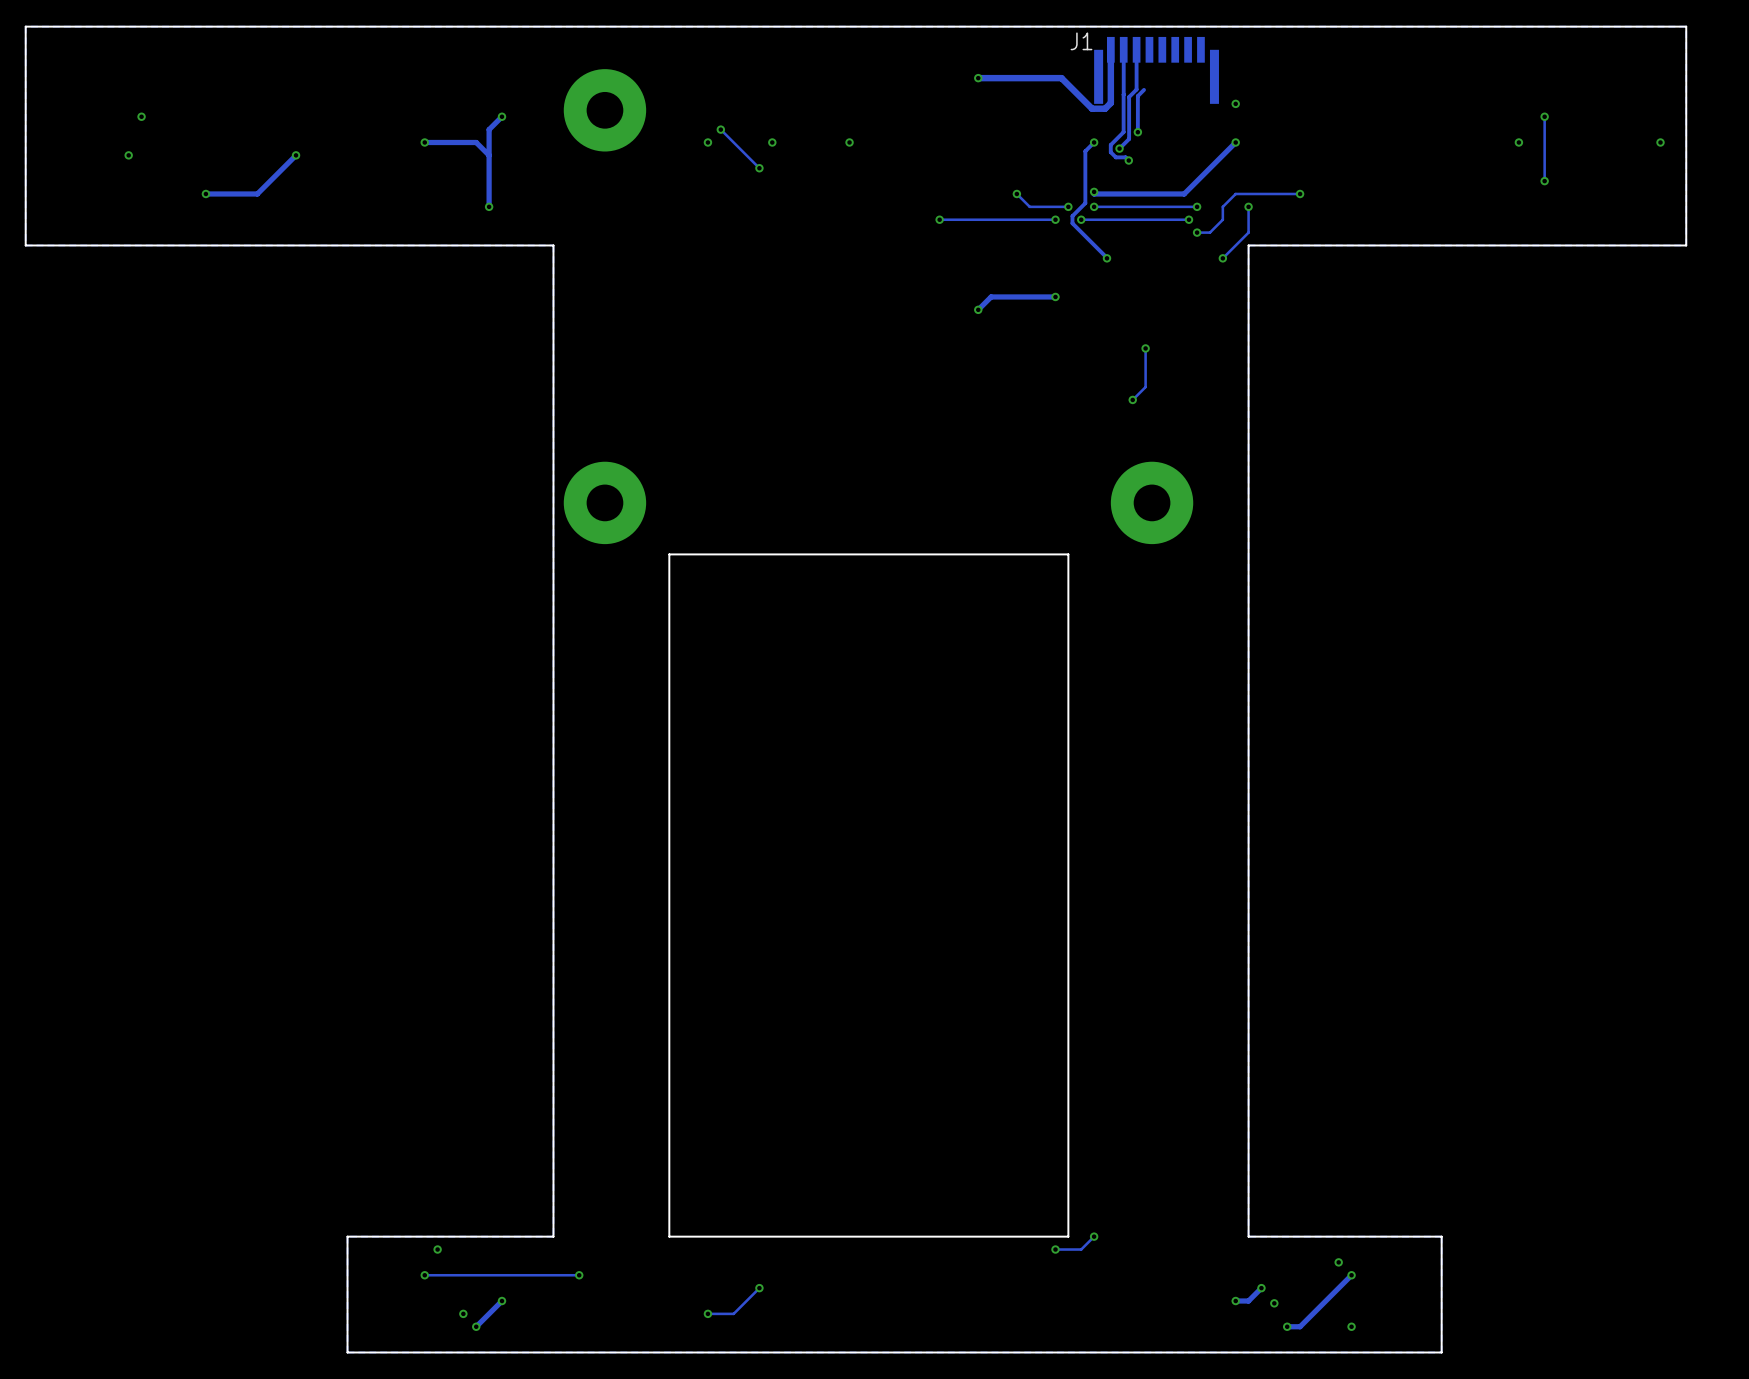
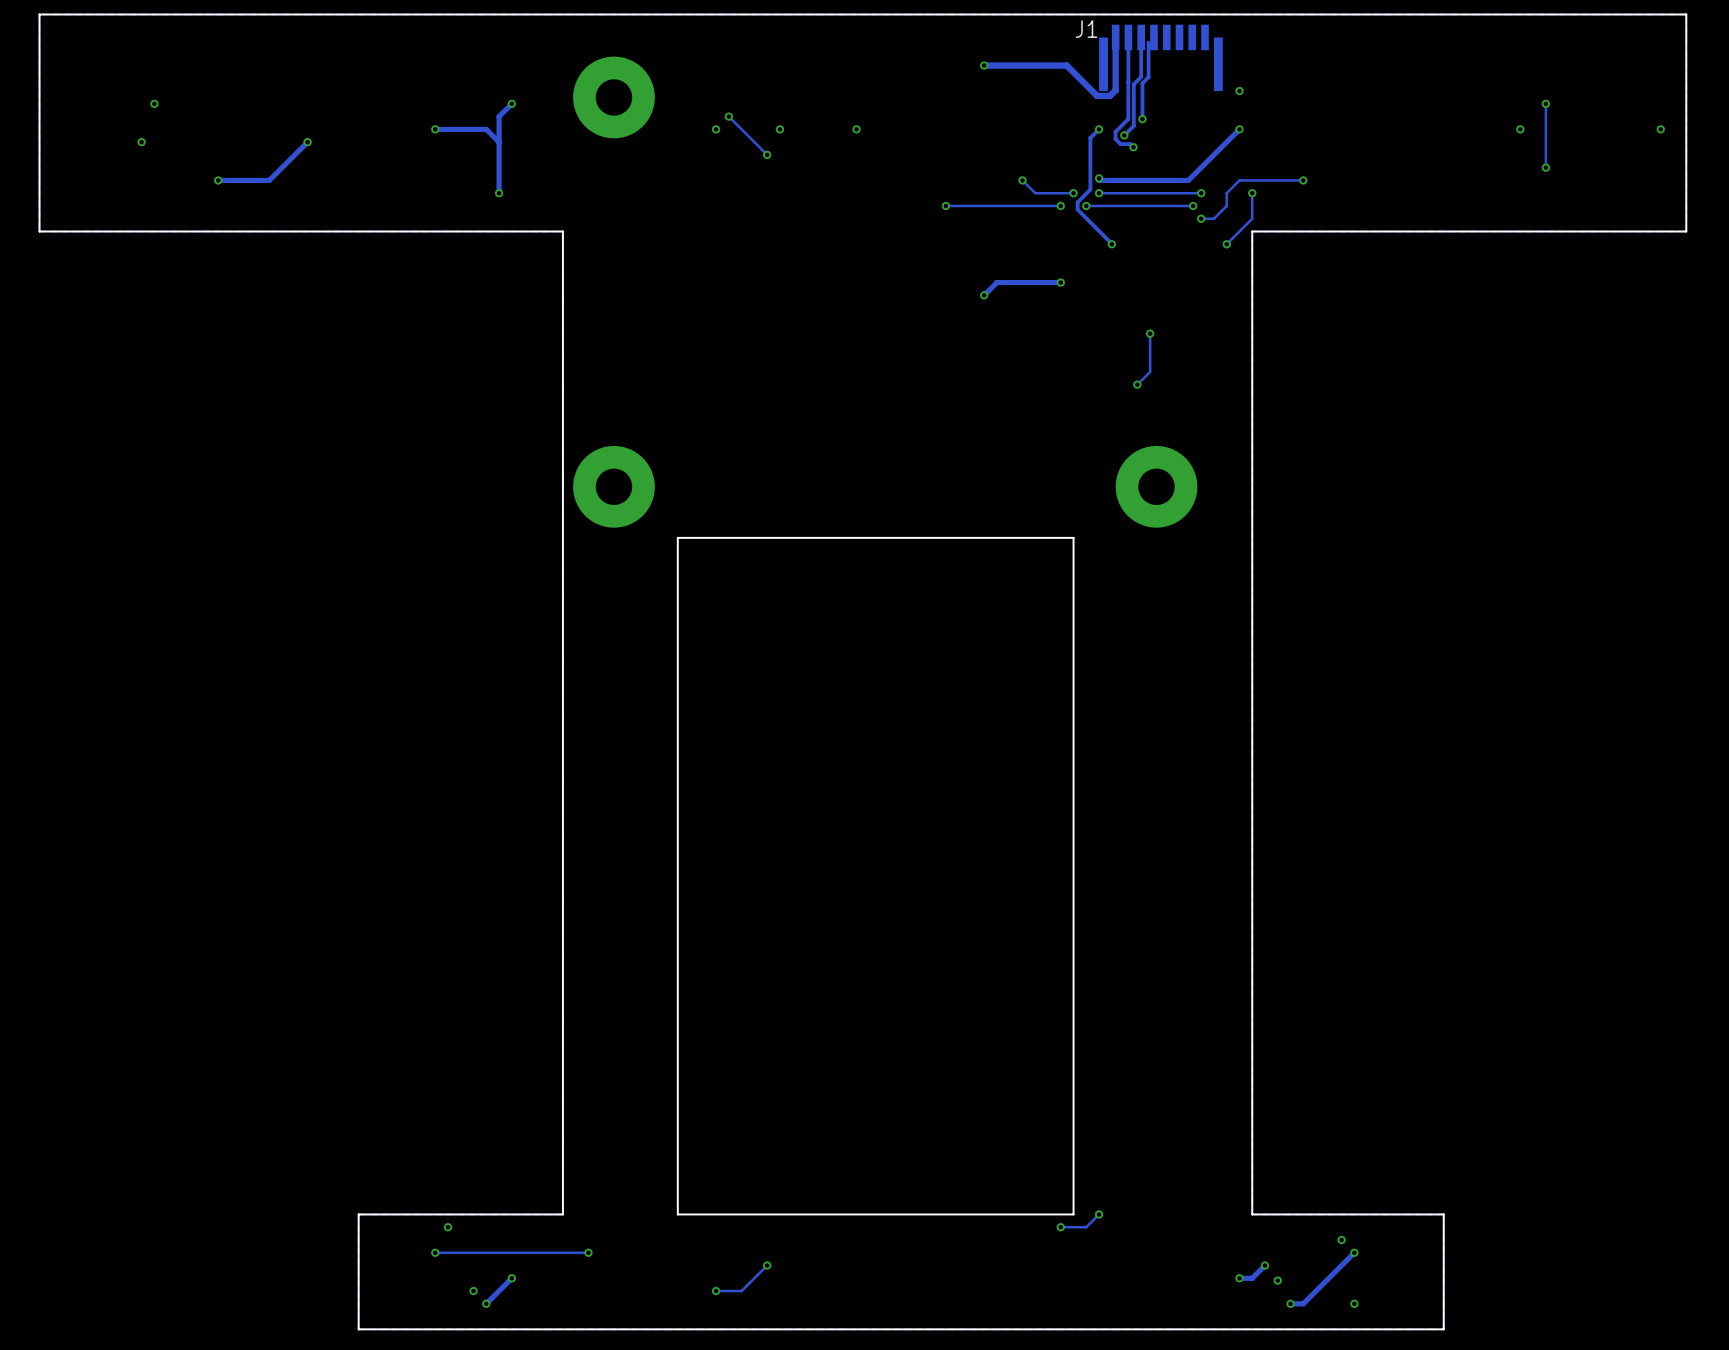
track: none -> (1148, 42) (1148, 77)

